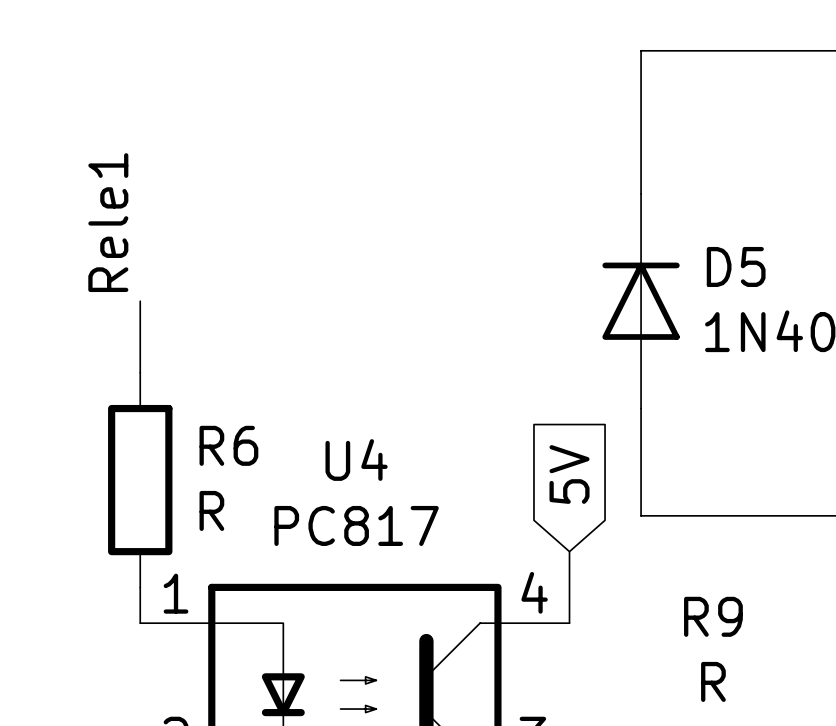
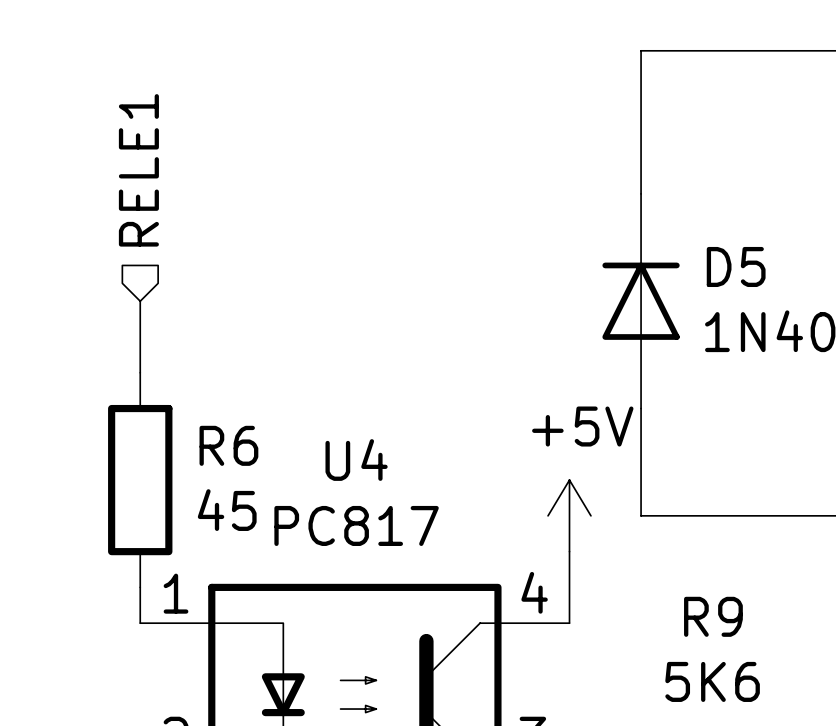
hierarchical label: none -> RELE1 (138, 170)
label: Rele1 (108, 222) -> none
global label: 5V (569, 474) -> none
R6 value: R (211, 510) -> 45 (227, 510)
power symbol: none -> +5V (569, 515)
R9 value: R (713, 681) -> 5K6 (712, 681)

